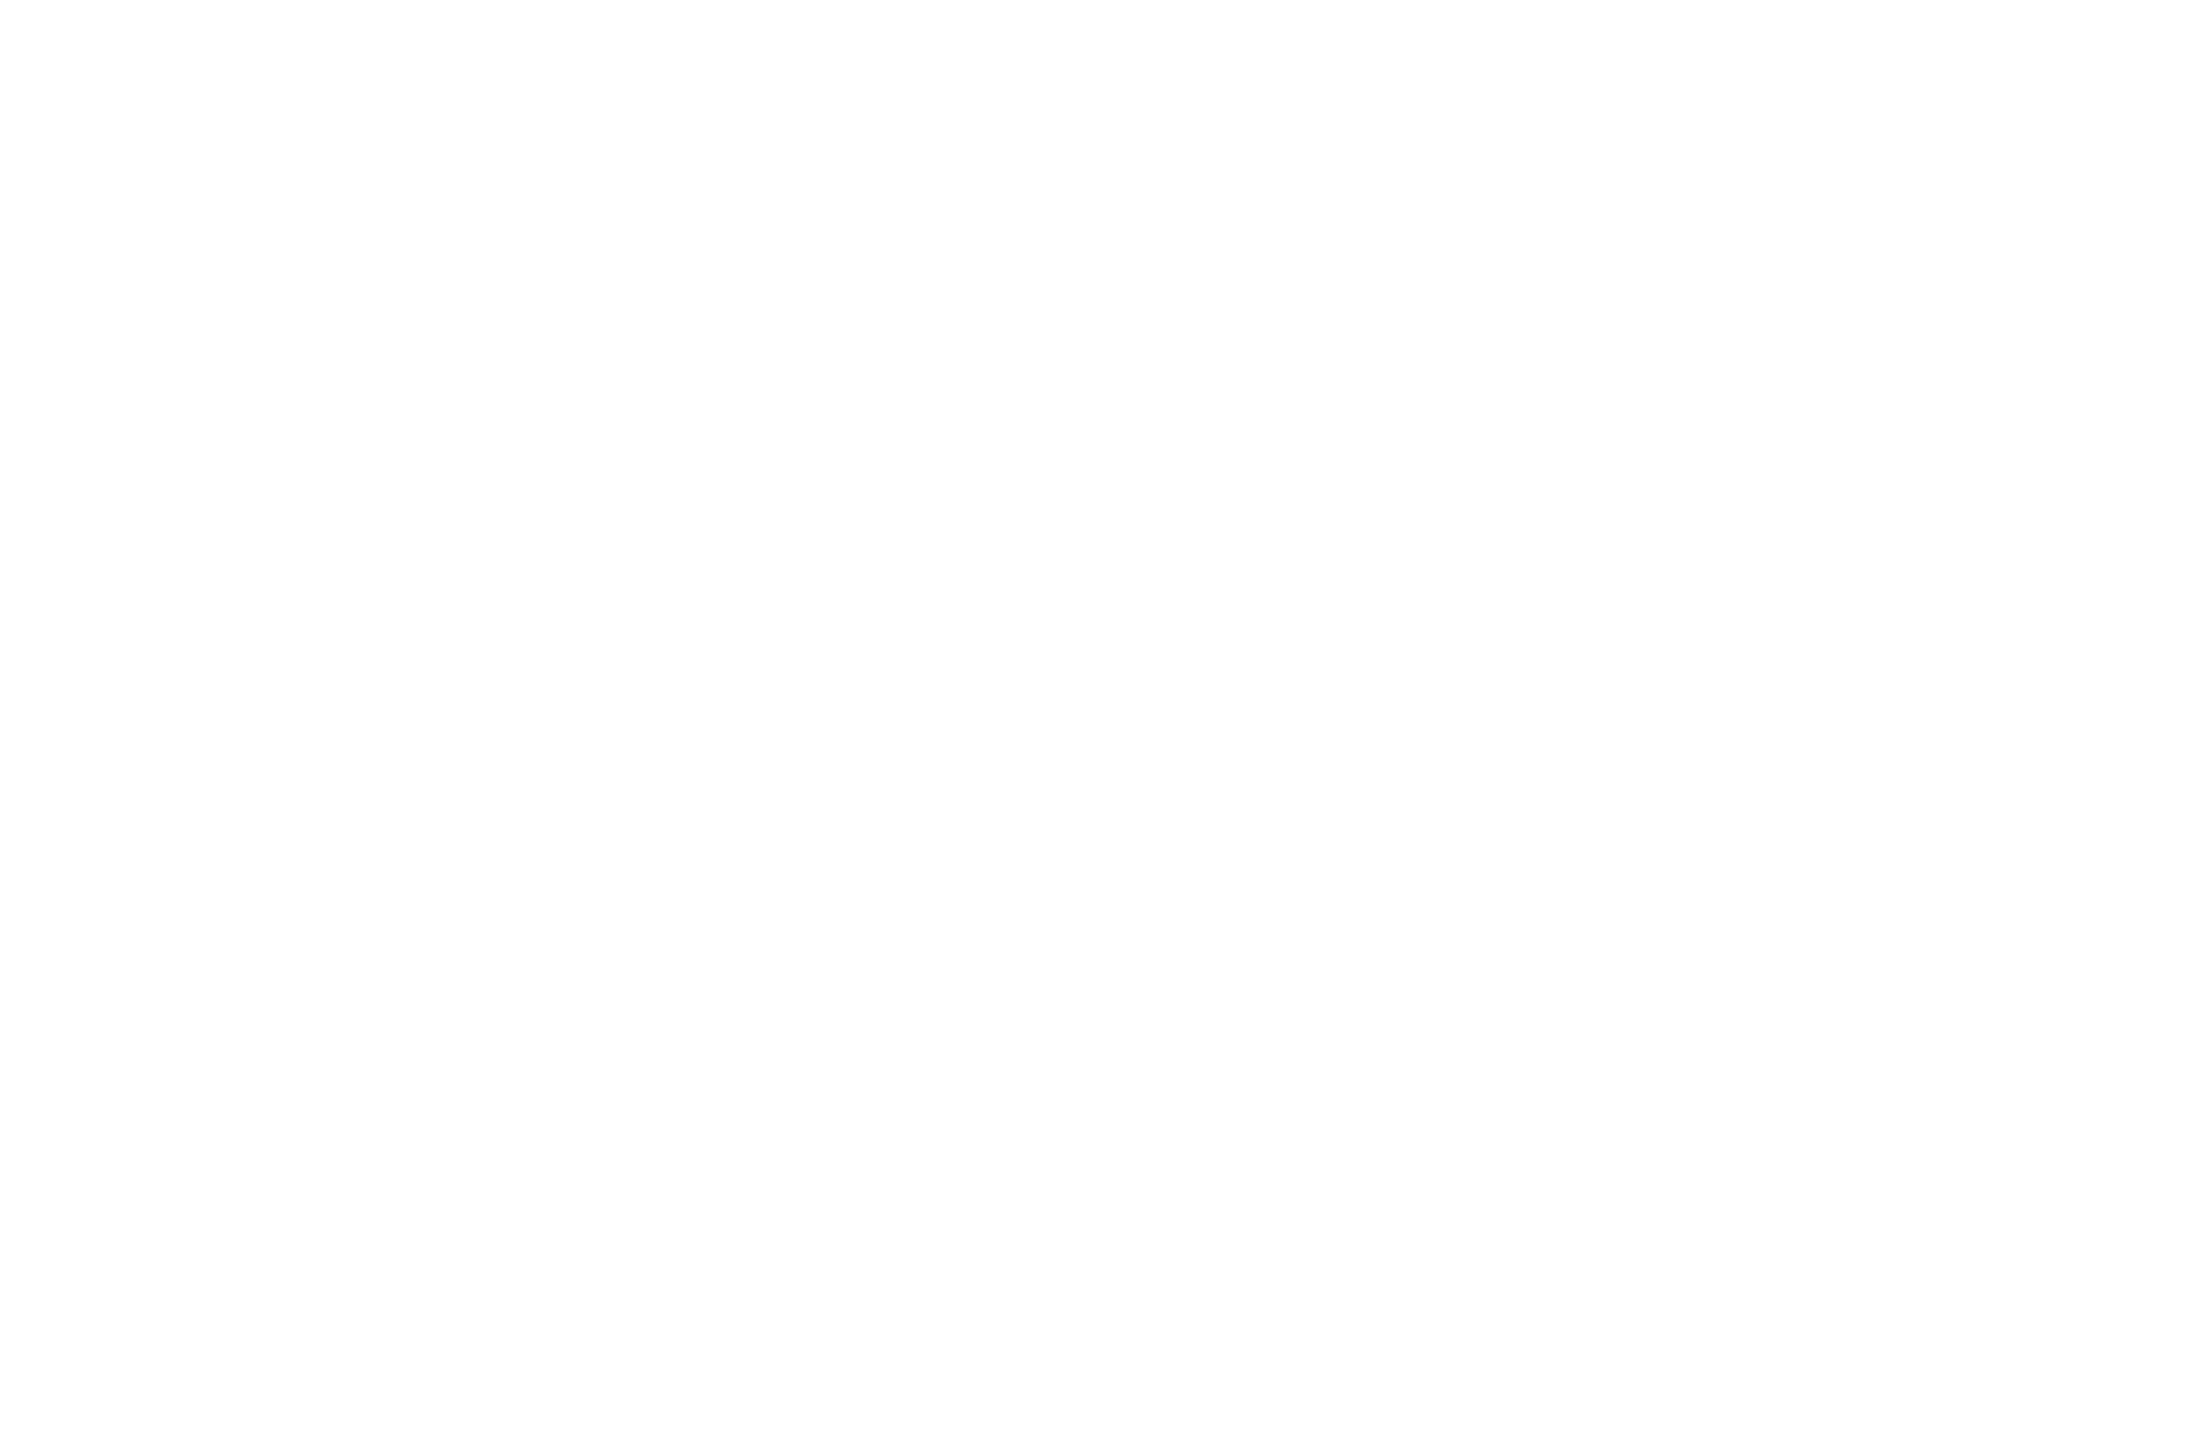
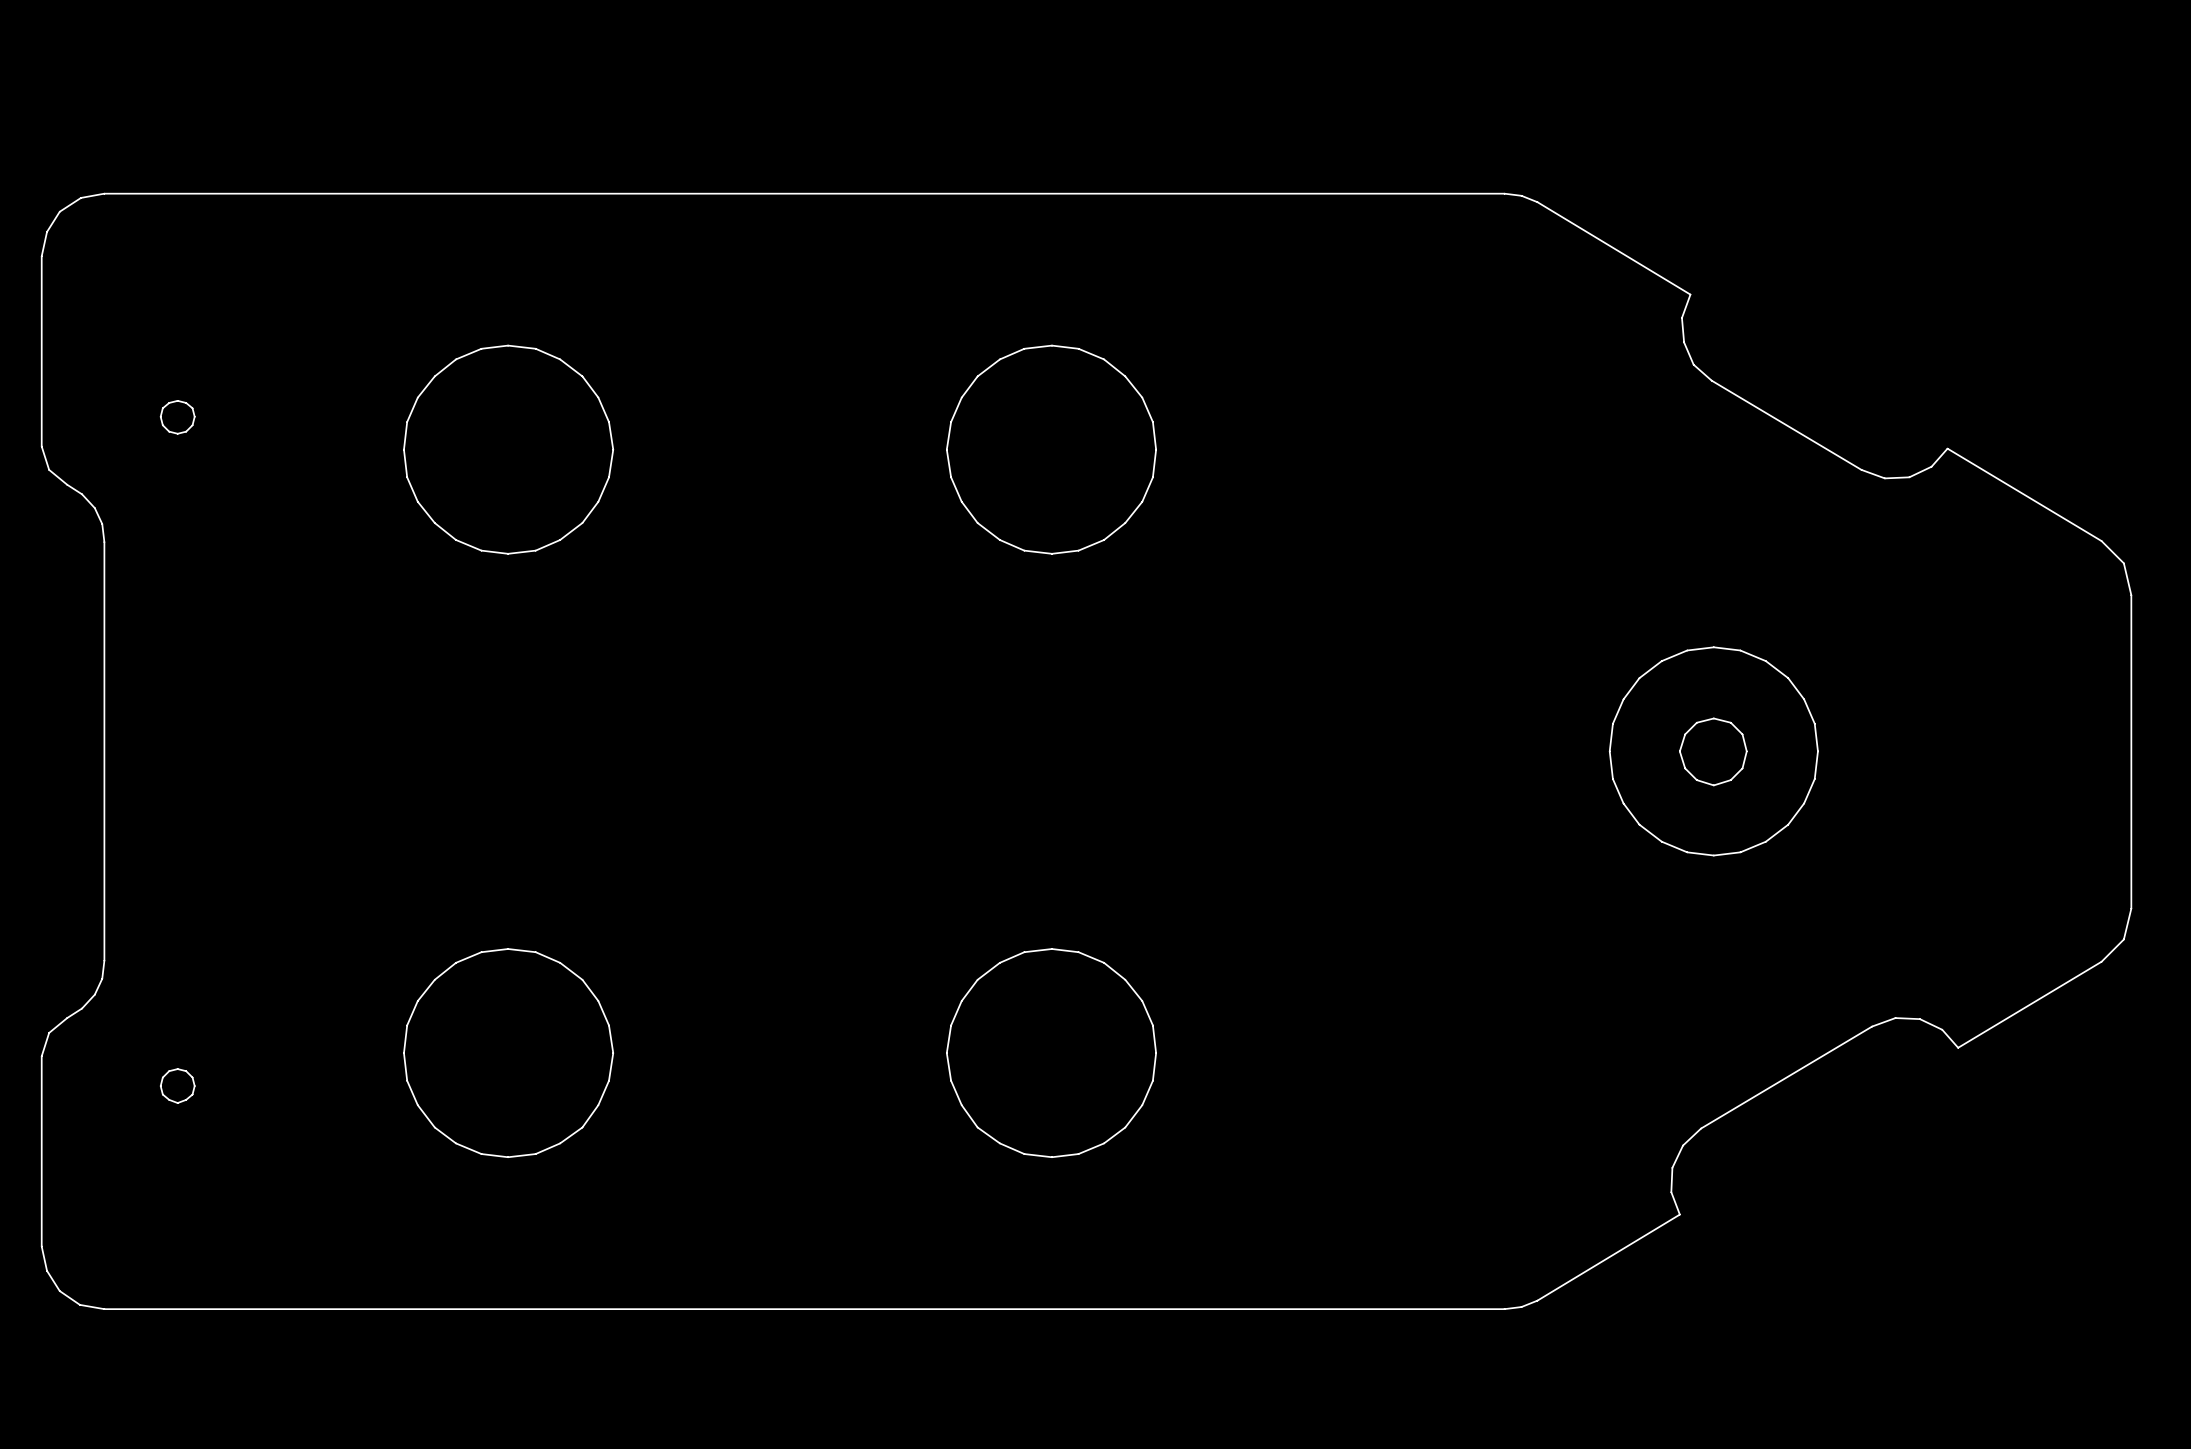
board edge: none -> (1504, 193) (104, 193) (81, 197) (59, 211) (47, 231) (41, 256) (41, 446) (49, 469) (82, 494) (94, 508) (102, 524) (104, 542) (104, 960) (102, 978) (94, 994) (82, 1008) (49, 1032) (41, 1056) (41, 1246) (47, 1270) (59, 1291) (79, 1304) (104, 1309) (1504, 1309) (1521, 1307) (1537, 1300) (1679, 1214) (1671, 1192) (1672, 1167) (1683, 1145) (1701, 1128) (1872, 1026) (1895, 1018) (1919, 1019) (1942, 1029) (1958, 1047) (2101, 961) (2123, 939) (2131, 908) (2131, 595) (2123, 563) (2101, 541) (1947, 448) (1931, 466) (1909, 477) (1884, 478) (1861, 469) (1711, 380) (1693, 364) (1684, 342) (1681, 317) (1690, 294) (1537, 202) (1521, 195) (1504, 193)
board edge: none -> (508, 345) (481, 348) (456, 359) (434, 376) (417, 397) (407, 422) (403, 449) (407, 477) (417, 501) (434, 523) (456, 540) (481, 550) (508, 553) (535, 550) (560, 540) (582, 523) (598, 501) (609, 477) (613, 449) (609, 422) (598, 397) (582, 376) (560, 359) (535, 348) (508, 345)
board edge: none -> (1052, 345) (1024, 348) (999, 359) (977, 376) (961, 397) (951, 422) (946, 449) (951, 477) (961, 501) (977, 523) (999, 540) (1024, 550) (1052, 553) (1078, 550) (1104, 540) (1125, 523) (1142, 501) (1152, 477) (1156, 449) (1152, 422) (1142, 397) (1125, 376) (1104, 359) (1078, 348) (1052, 345)
board edge: none -> (177, 400) (169, 402) (162, 408) (160, 416) (162, 425) (169, 431) (177, 433) (186, 431) (192, 425) (194, 416) (192, 408) (186, 402) (177, 400)
board edge: none -> (1713, 647) (1687, 650) (1661, 661) (1639, 678) (1623, 699) (1612, 723) (1609, 751) (1612, 779) (1623, 803) (1639, 824) (1661, 841) (1687, 852) (1713, 855) (1740, 852) (1765, 841) (1788, 824) (1804, 803) (1814, 779) (1817, 751) (1814, 723) (1804, 699) (1788, 678) (1765, 661) (1740, 650) (1713, 647)
board edge: none -> (1713, 718) (1696, 722) (1685, 734) (1679, 751) (1685, 768) (1696, 780) (1713, 785) (1730, 780) (1742, 768) (1746, 751) (1742, 734) (1730, 722) (1713, 718)
board edge: none -> (508, 949) (481, 952) (456, 962) (434, 979) (417, 1001) (407, 1025) (403, 1053) (407, 1080) (417, 1105) (434, 1127) (456, 1143) (481, 1154) (508, 1157) (535, 1154) (560, 1143) (582, 1127) (598, 1105) (609, 1080) (613, 1053) (609, 1025) (598, 1001) (582, 979) (560, 962) (535, 952) (508, 949)
board edge: none -> (1052, 949) (1024, 952) (999, 962) (977, 979) (961, 1001) (951, 1025) (946, 1053) (951, 1080) (961, 1105) (977, 1127) (999, 1143) (1024, 1154) (1052, 1157) (1078, 1154) (1104, 1143) (1125, 1127) (1142, 1105) (1152, 1080) (1156, 1053) (1152, 1025) (1142, 1001) (1125, 979) (1104, 962) (1078, 952) (1052, 949)
board edge: none -> (177, 1069) (169, 1071) (162, 1077) (160, 1086) (162, 1094) (177, 1103) (192, 1094) (194, 1086) (192, 1077) (186, 1071) (177, 1069)

